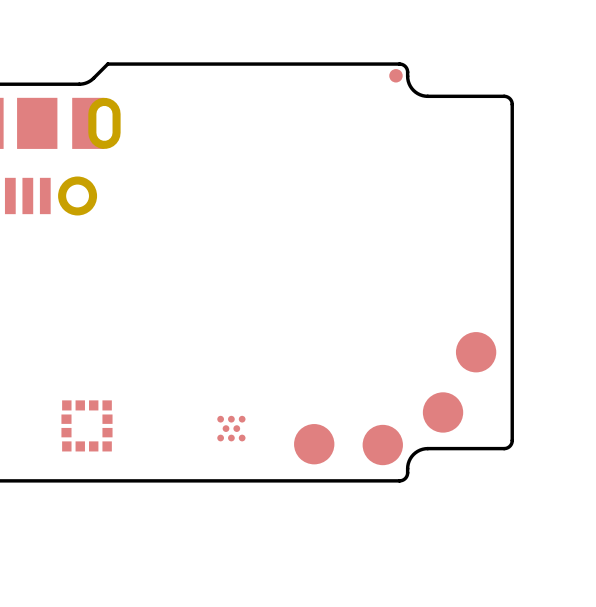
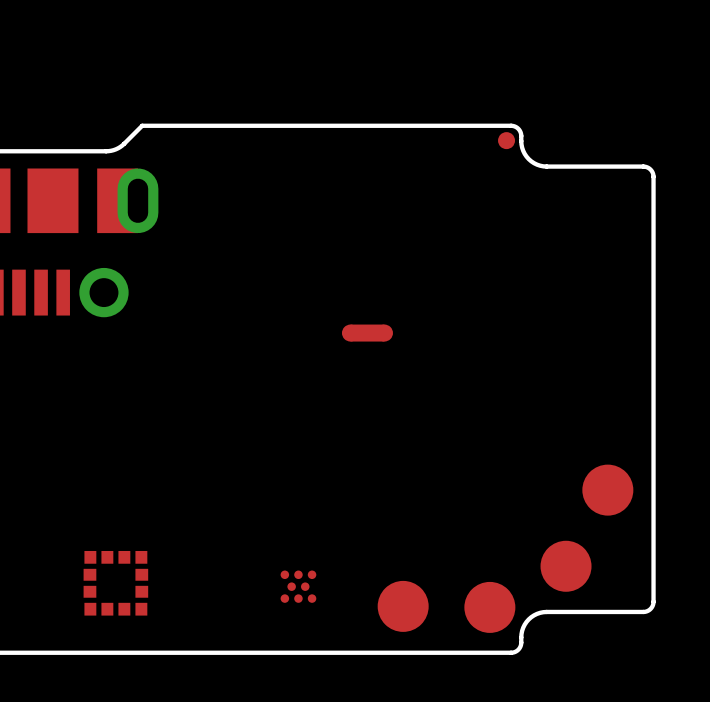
part: none -> (367, 333)

